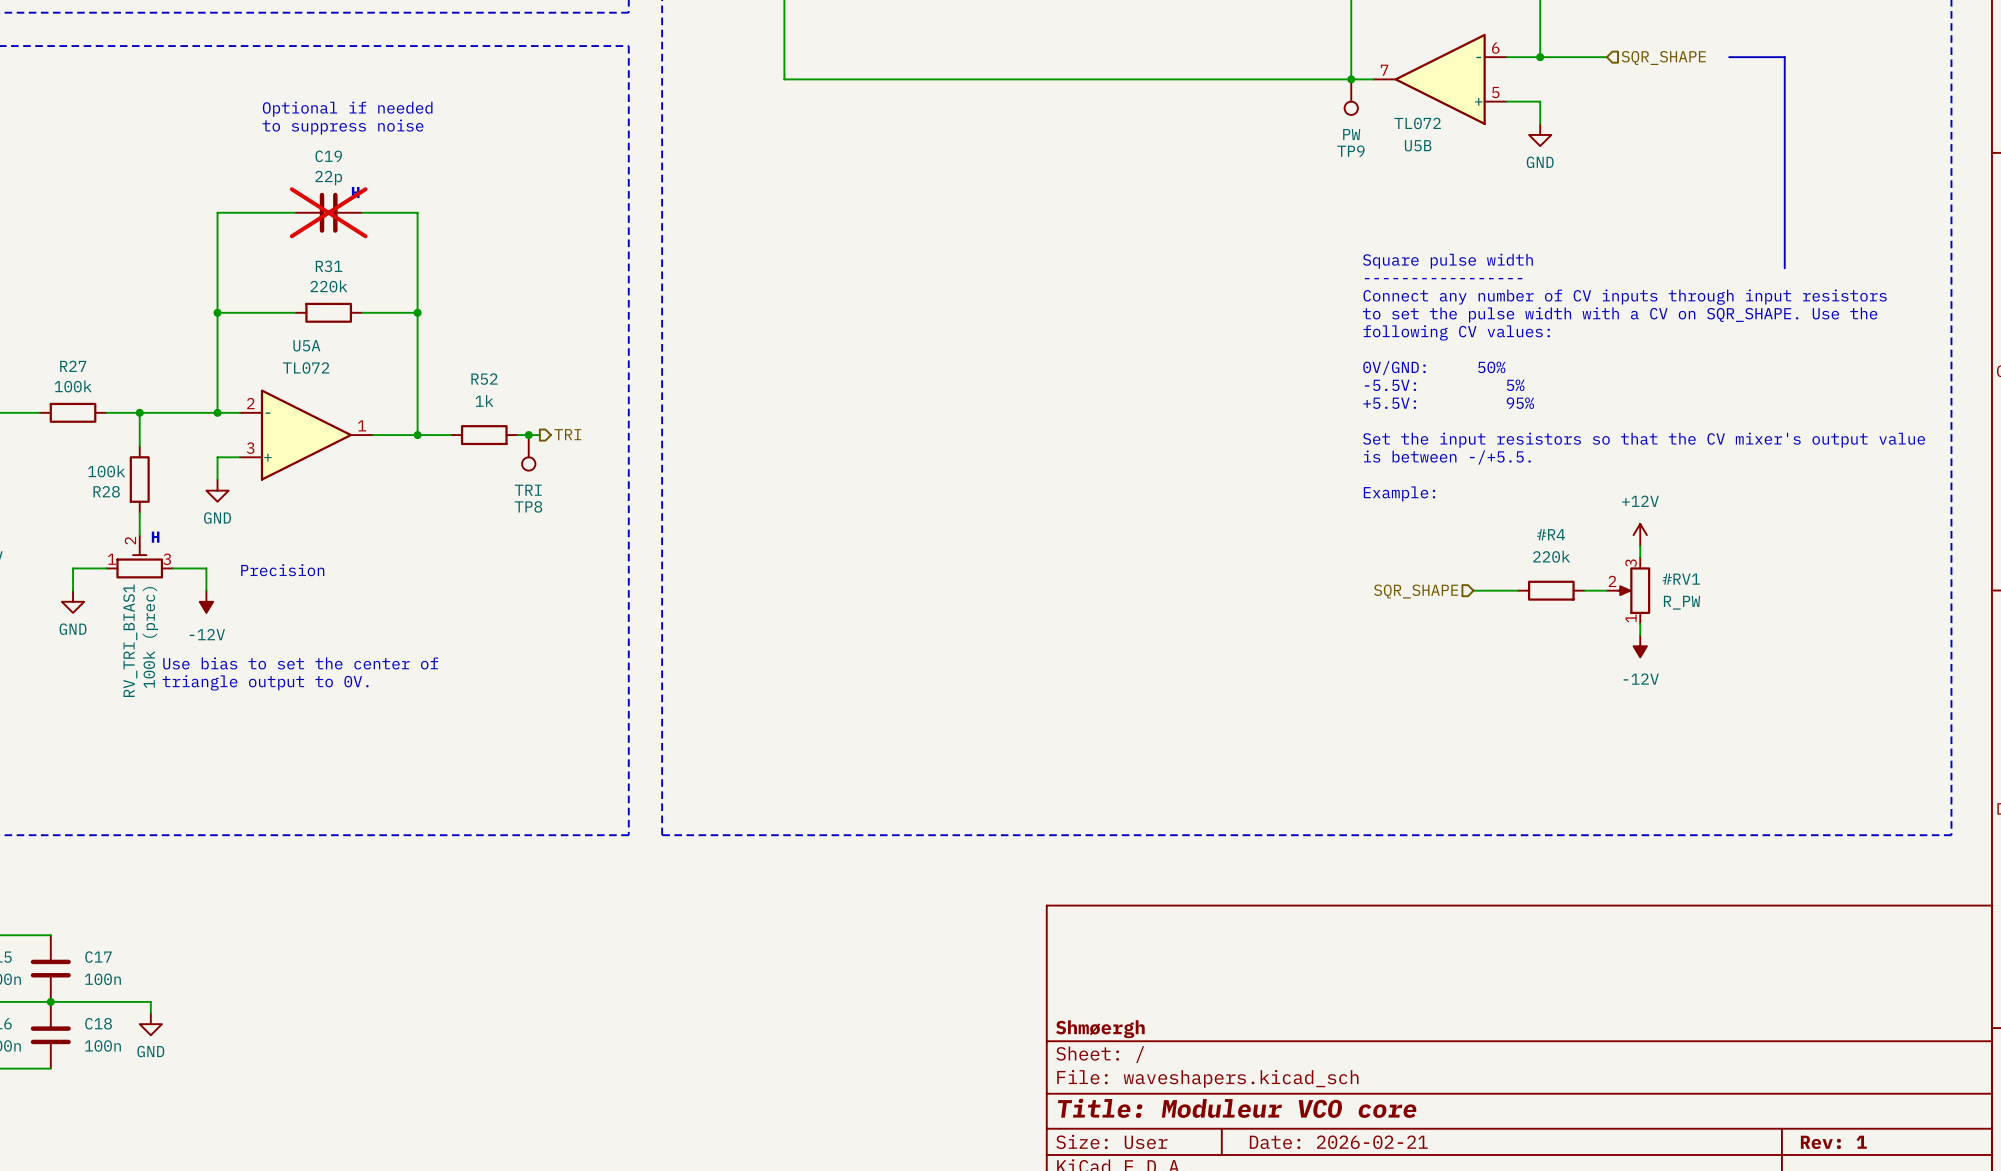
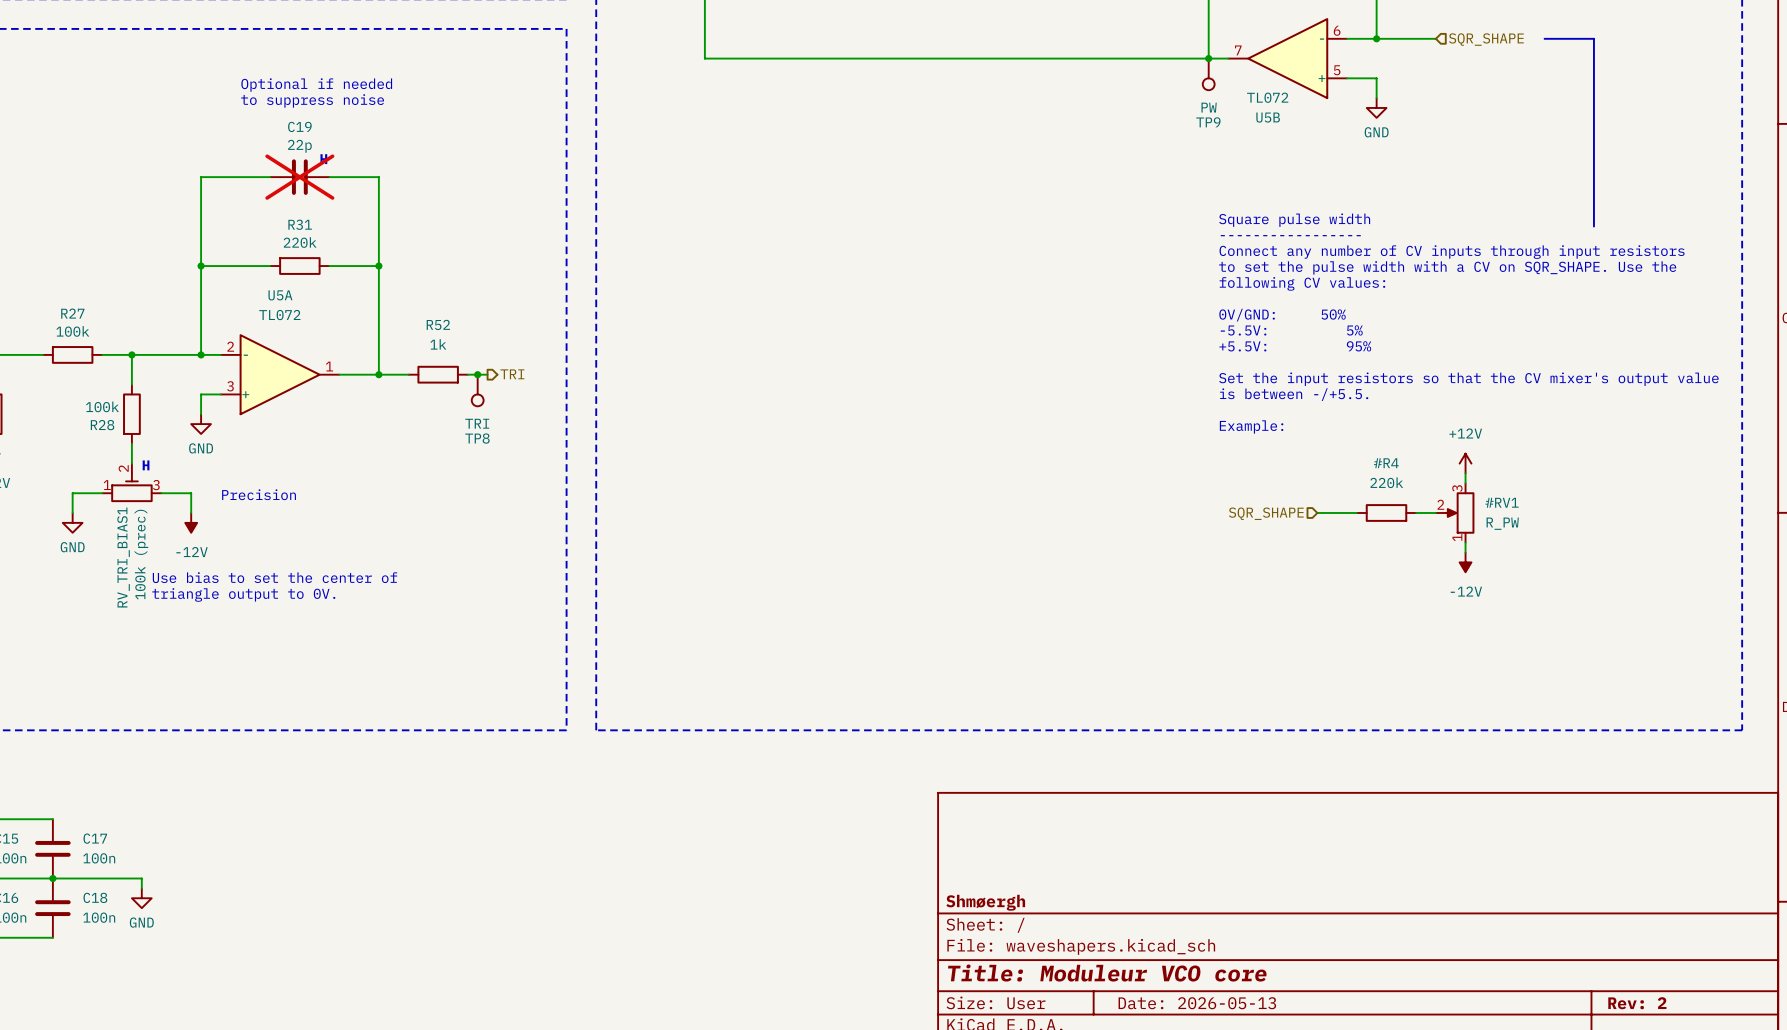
title block: Date: 2026-02-21 (1338, 1142) -> Date: 2026-05-13 (1197, 1003)
title block: Rev: 1 (1833, 1142) -> Rev: 2 (1637, 1003)

